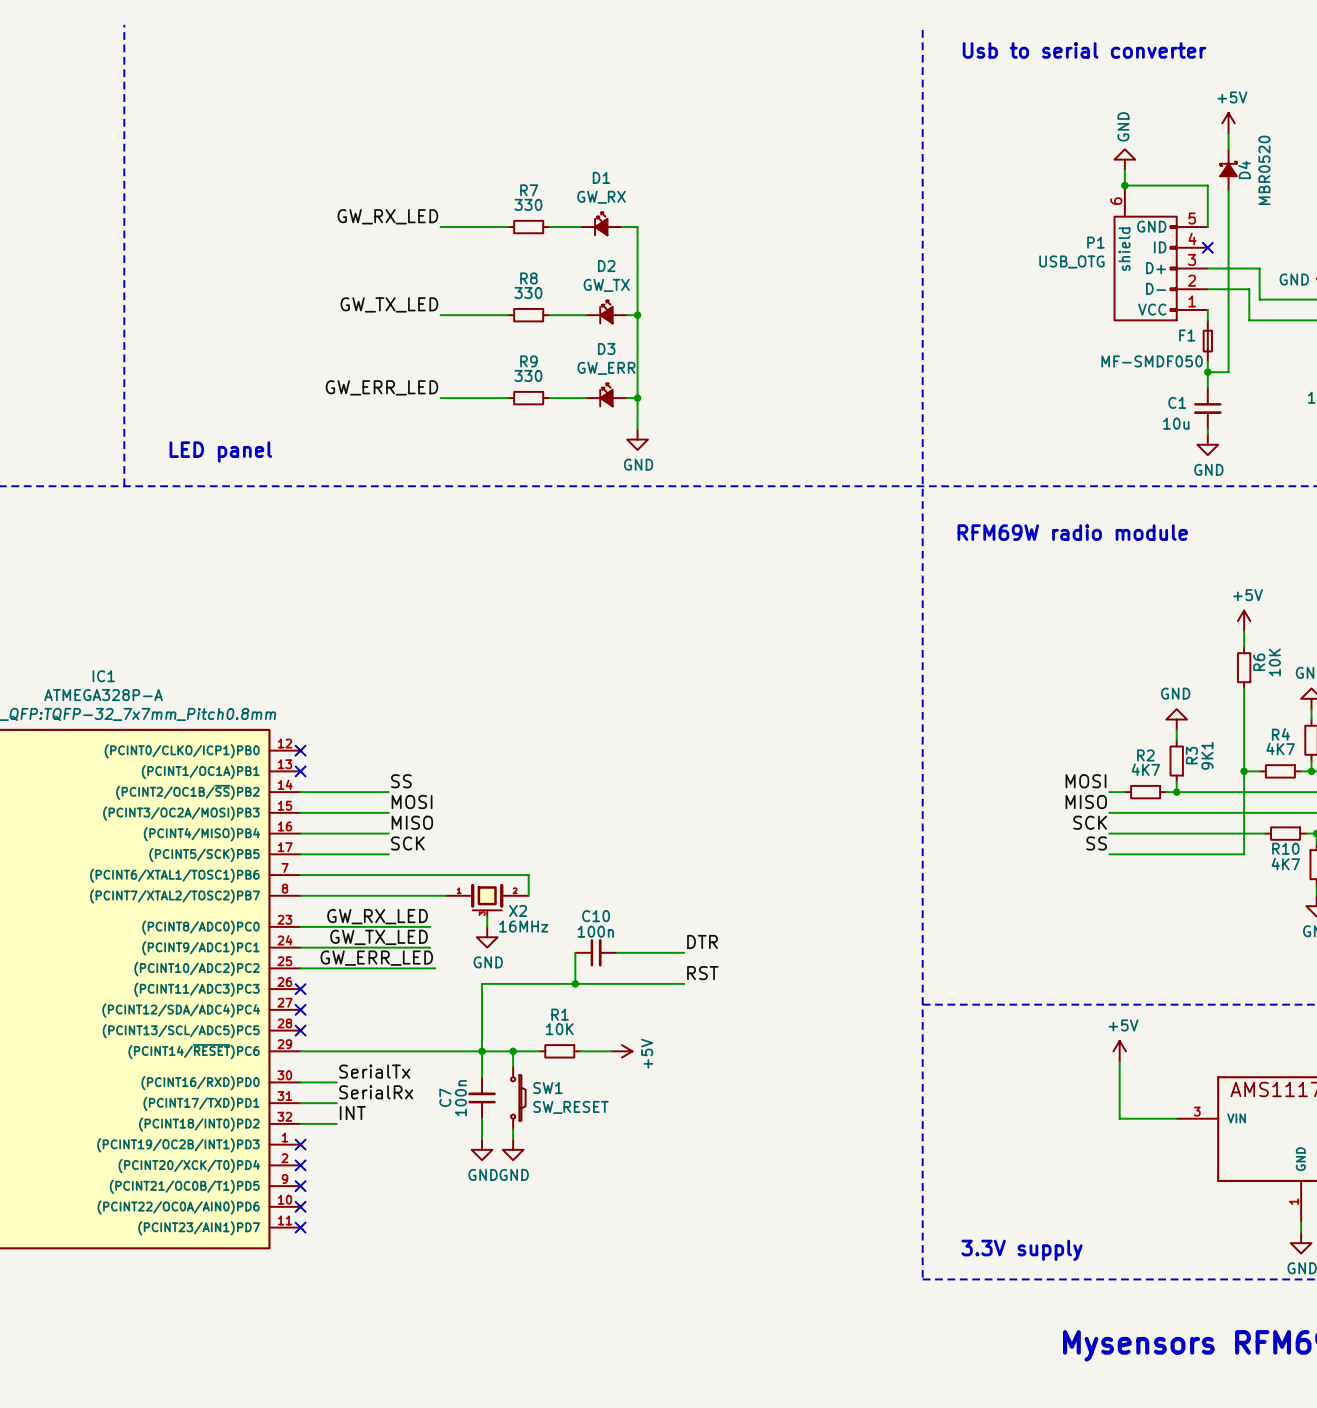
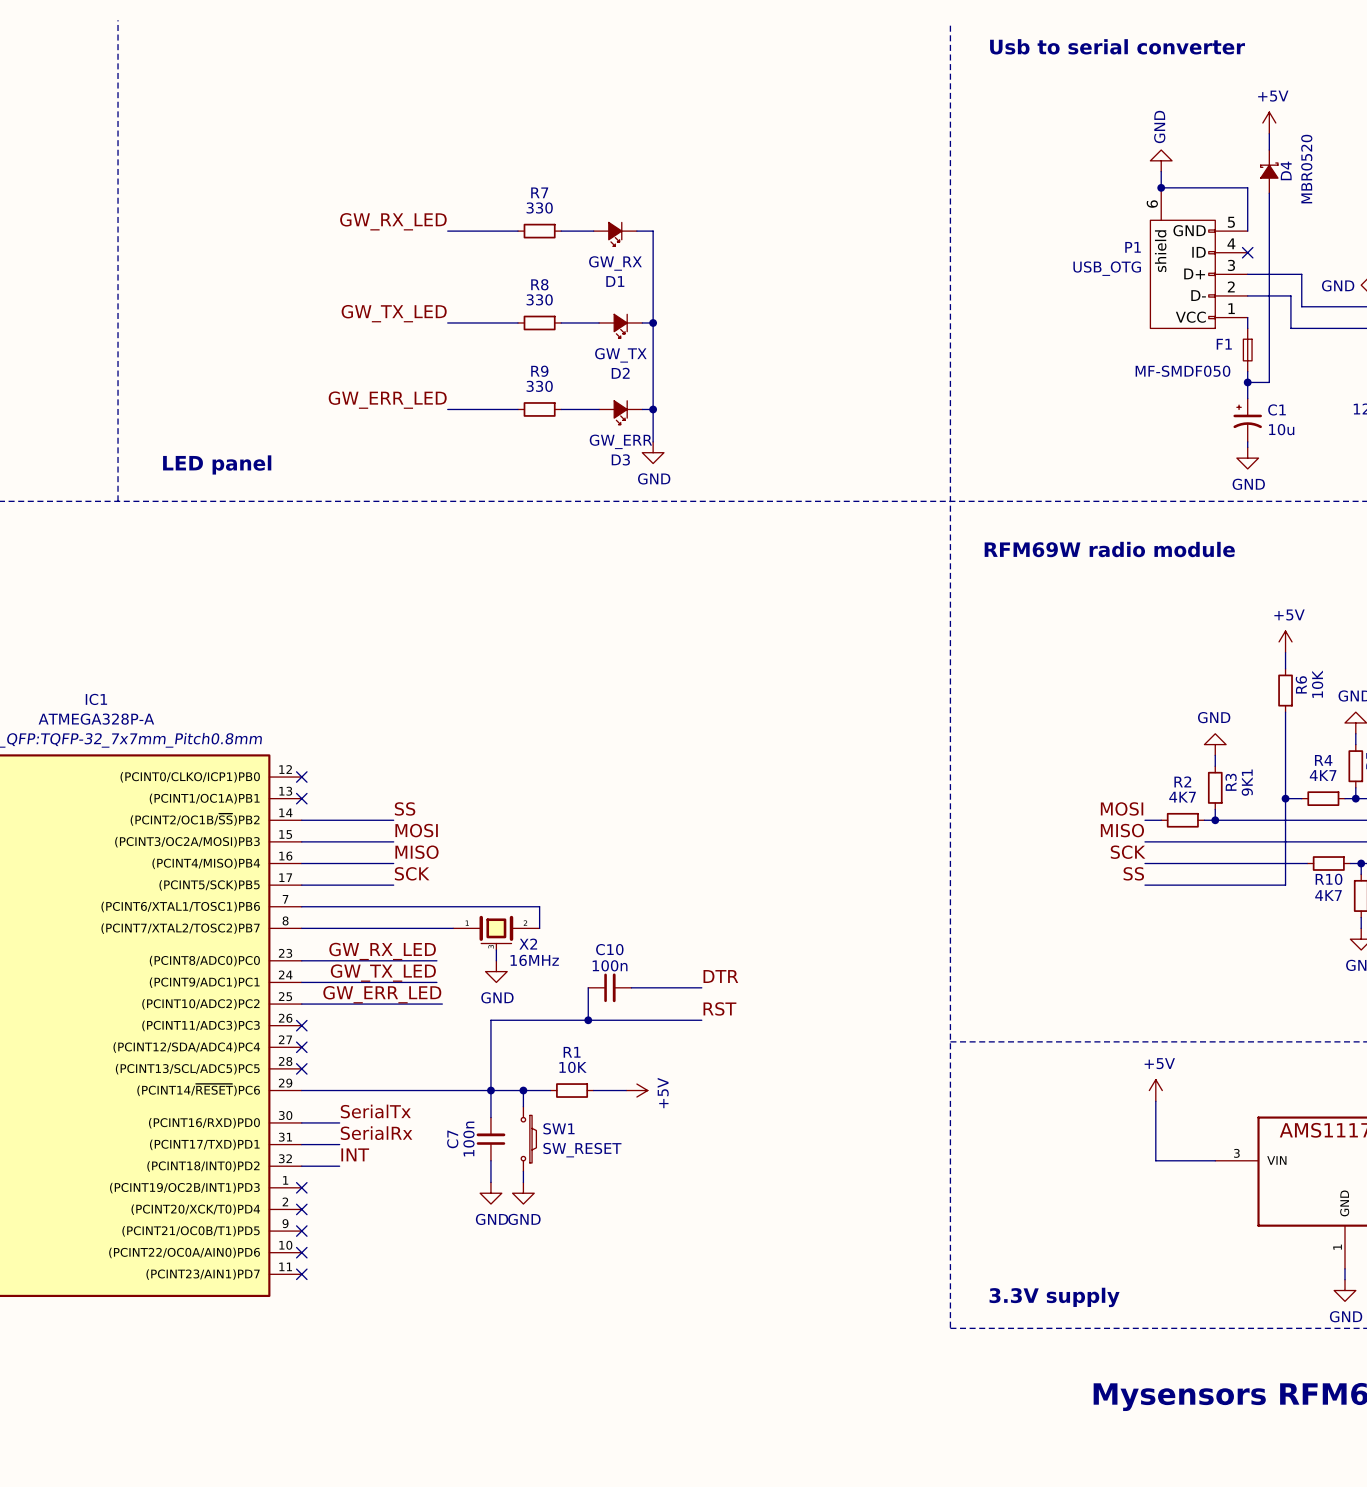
D1 rotation: 0° (601, 223) -> 180° (615, 234)
D2 rotation: 0° (606, 312) -> 180° (620, 326)
C1 symbol: [1194, 387, 1222, 430] -> [1233, 398, 1262, 442]
D3 rotation: 0° (606, 395) -> 180° (620, 412)
C1 name position: C1 (1177, 402) -> C1 (1277, 409)
C1 value position: 10u (1176, 423) -> 10u (1281, 429)

